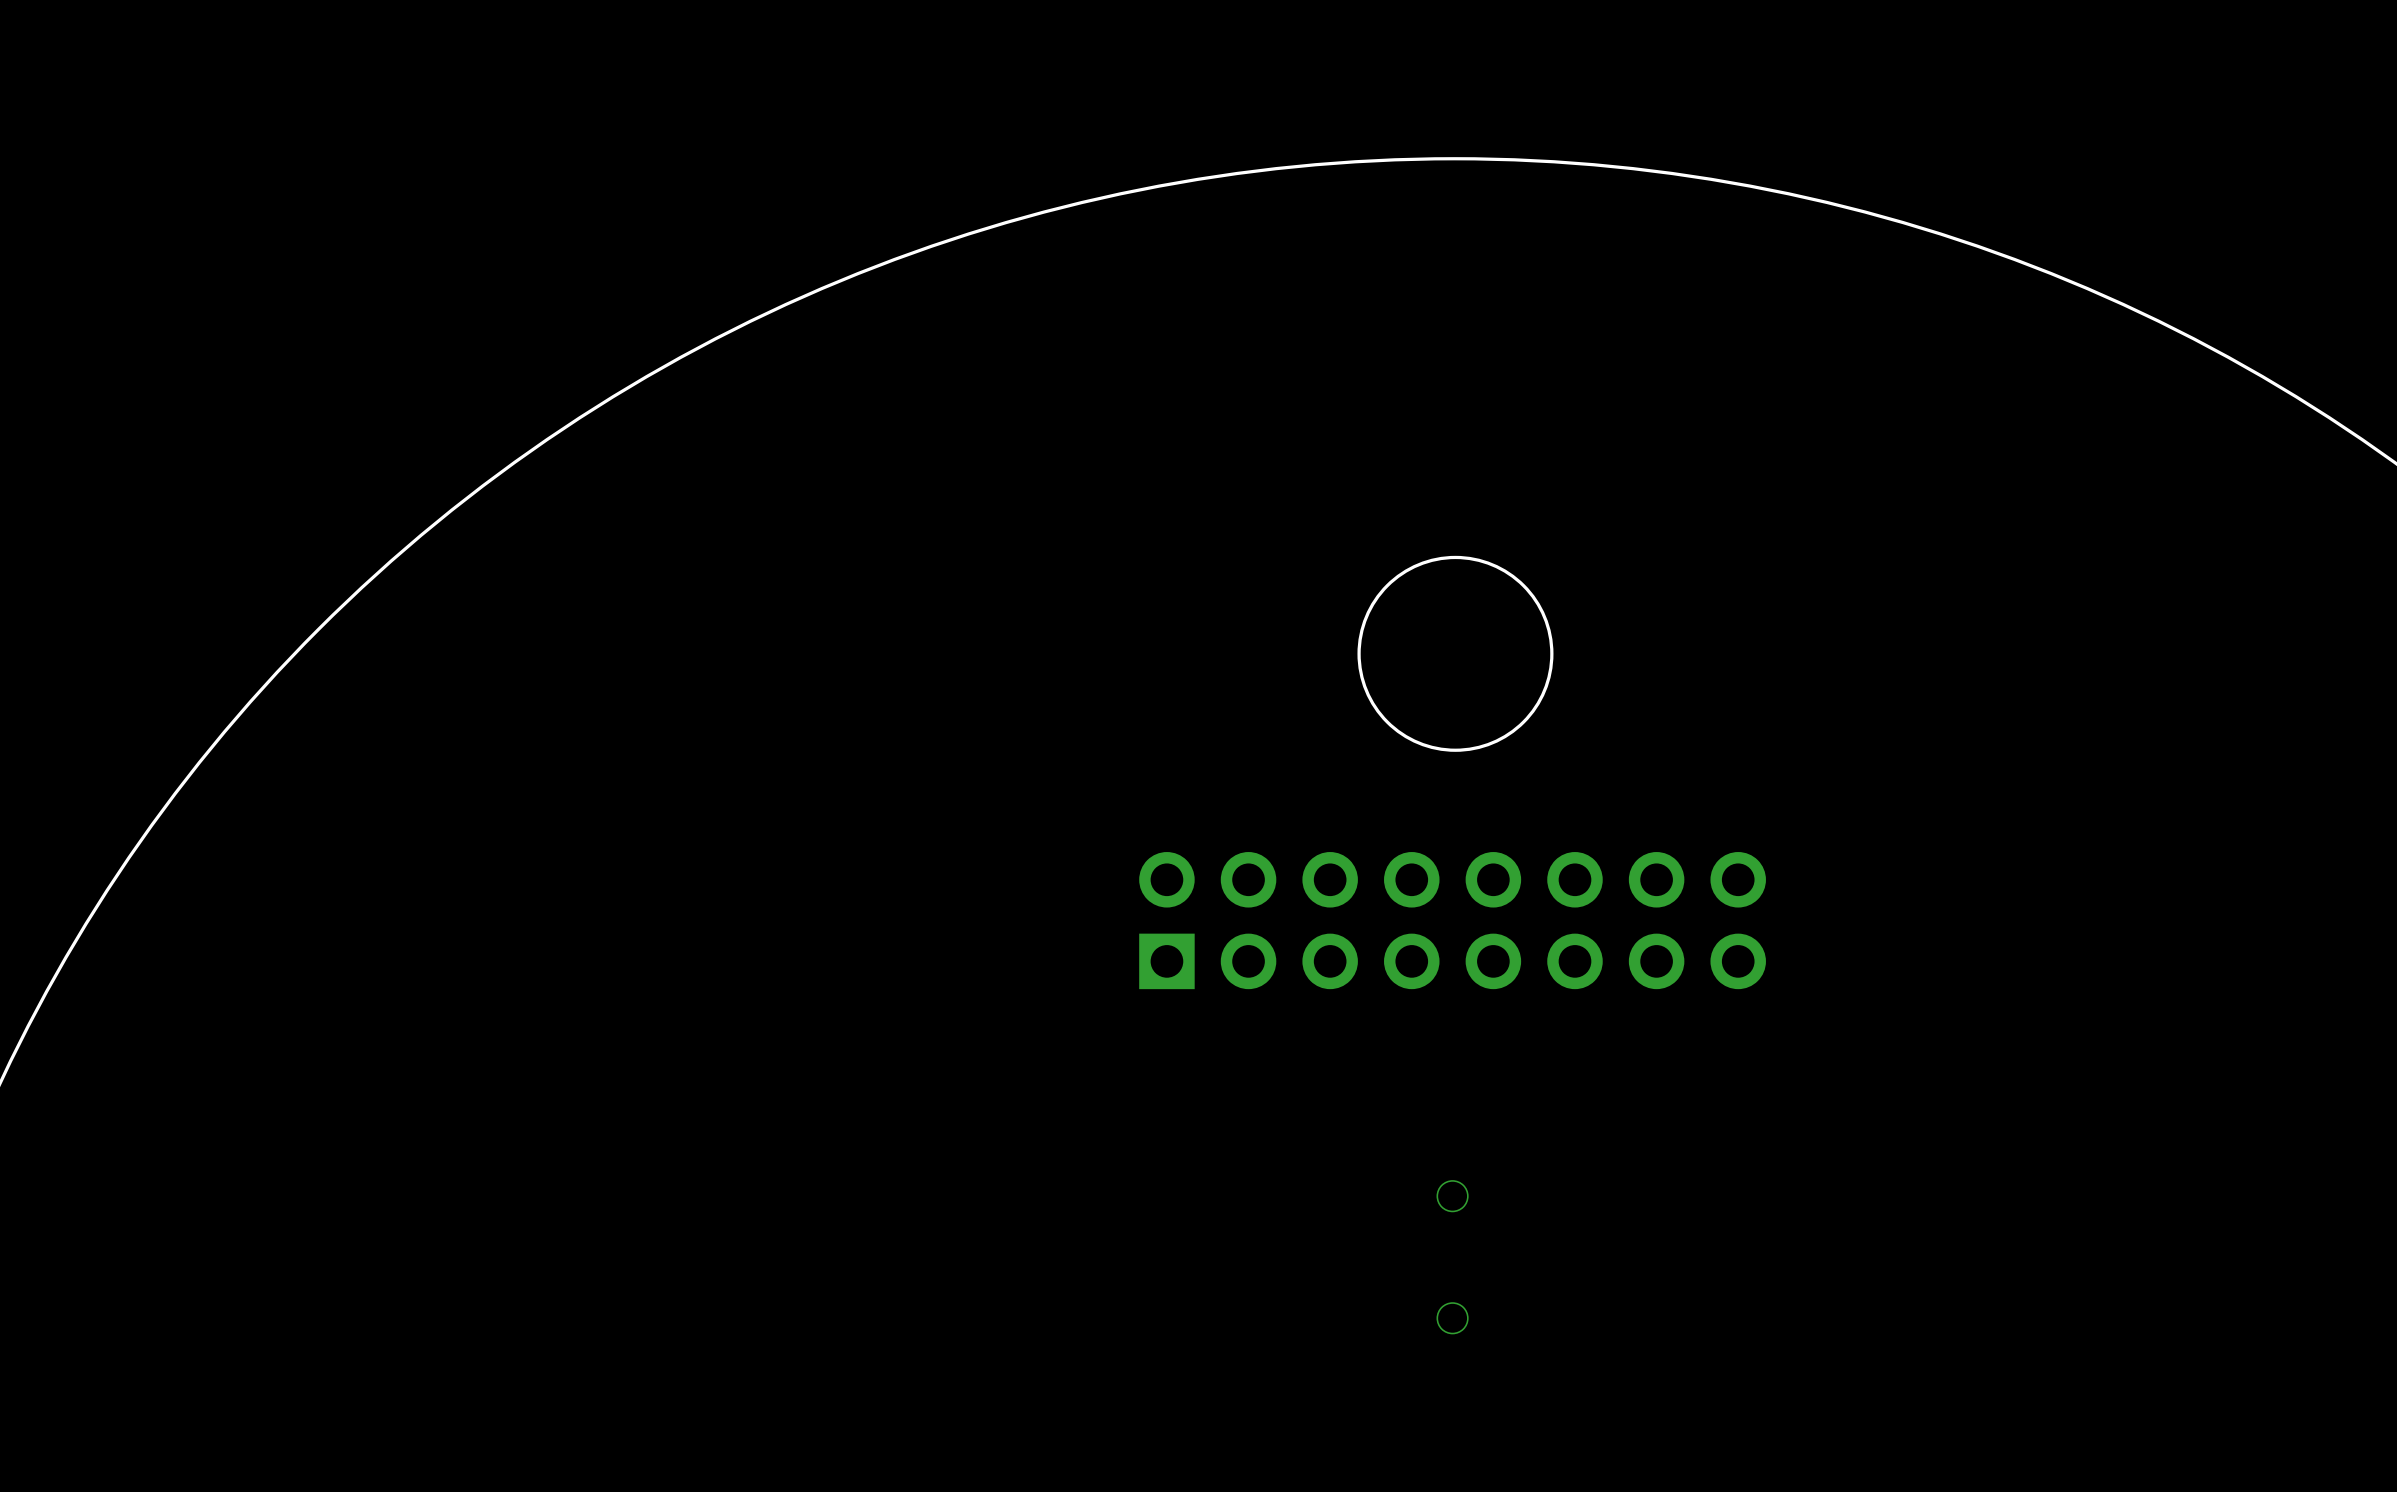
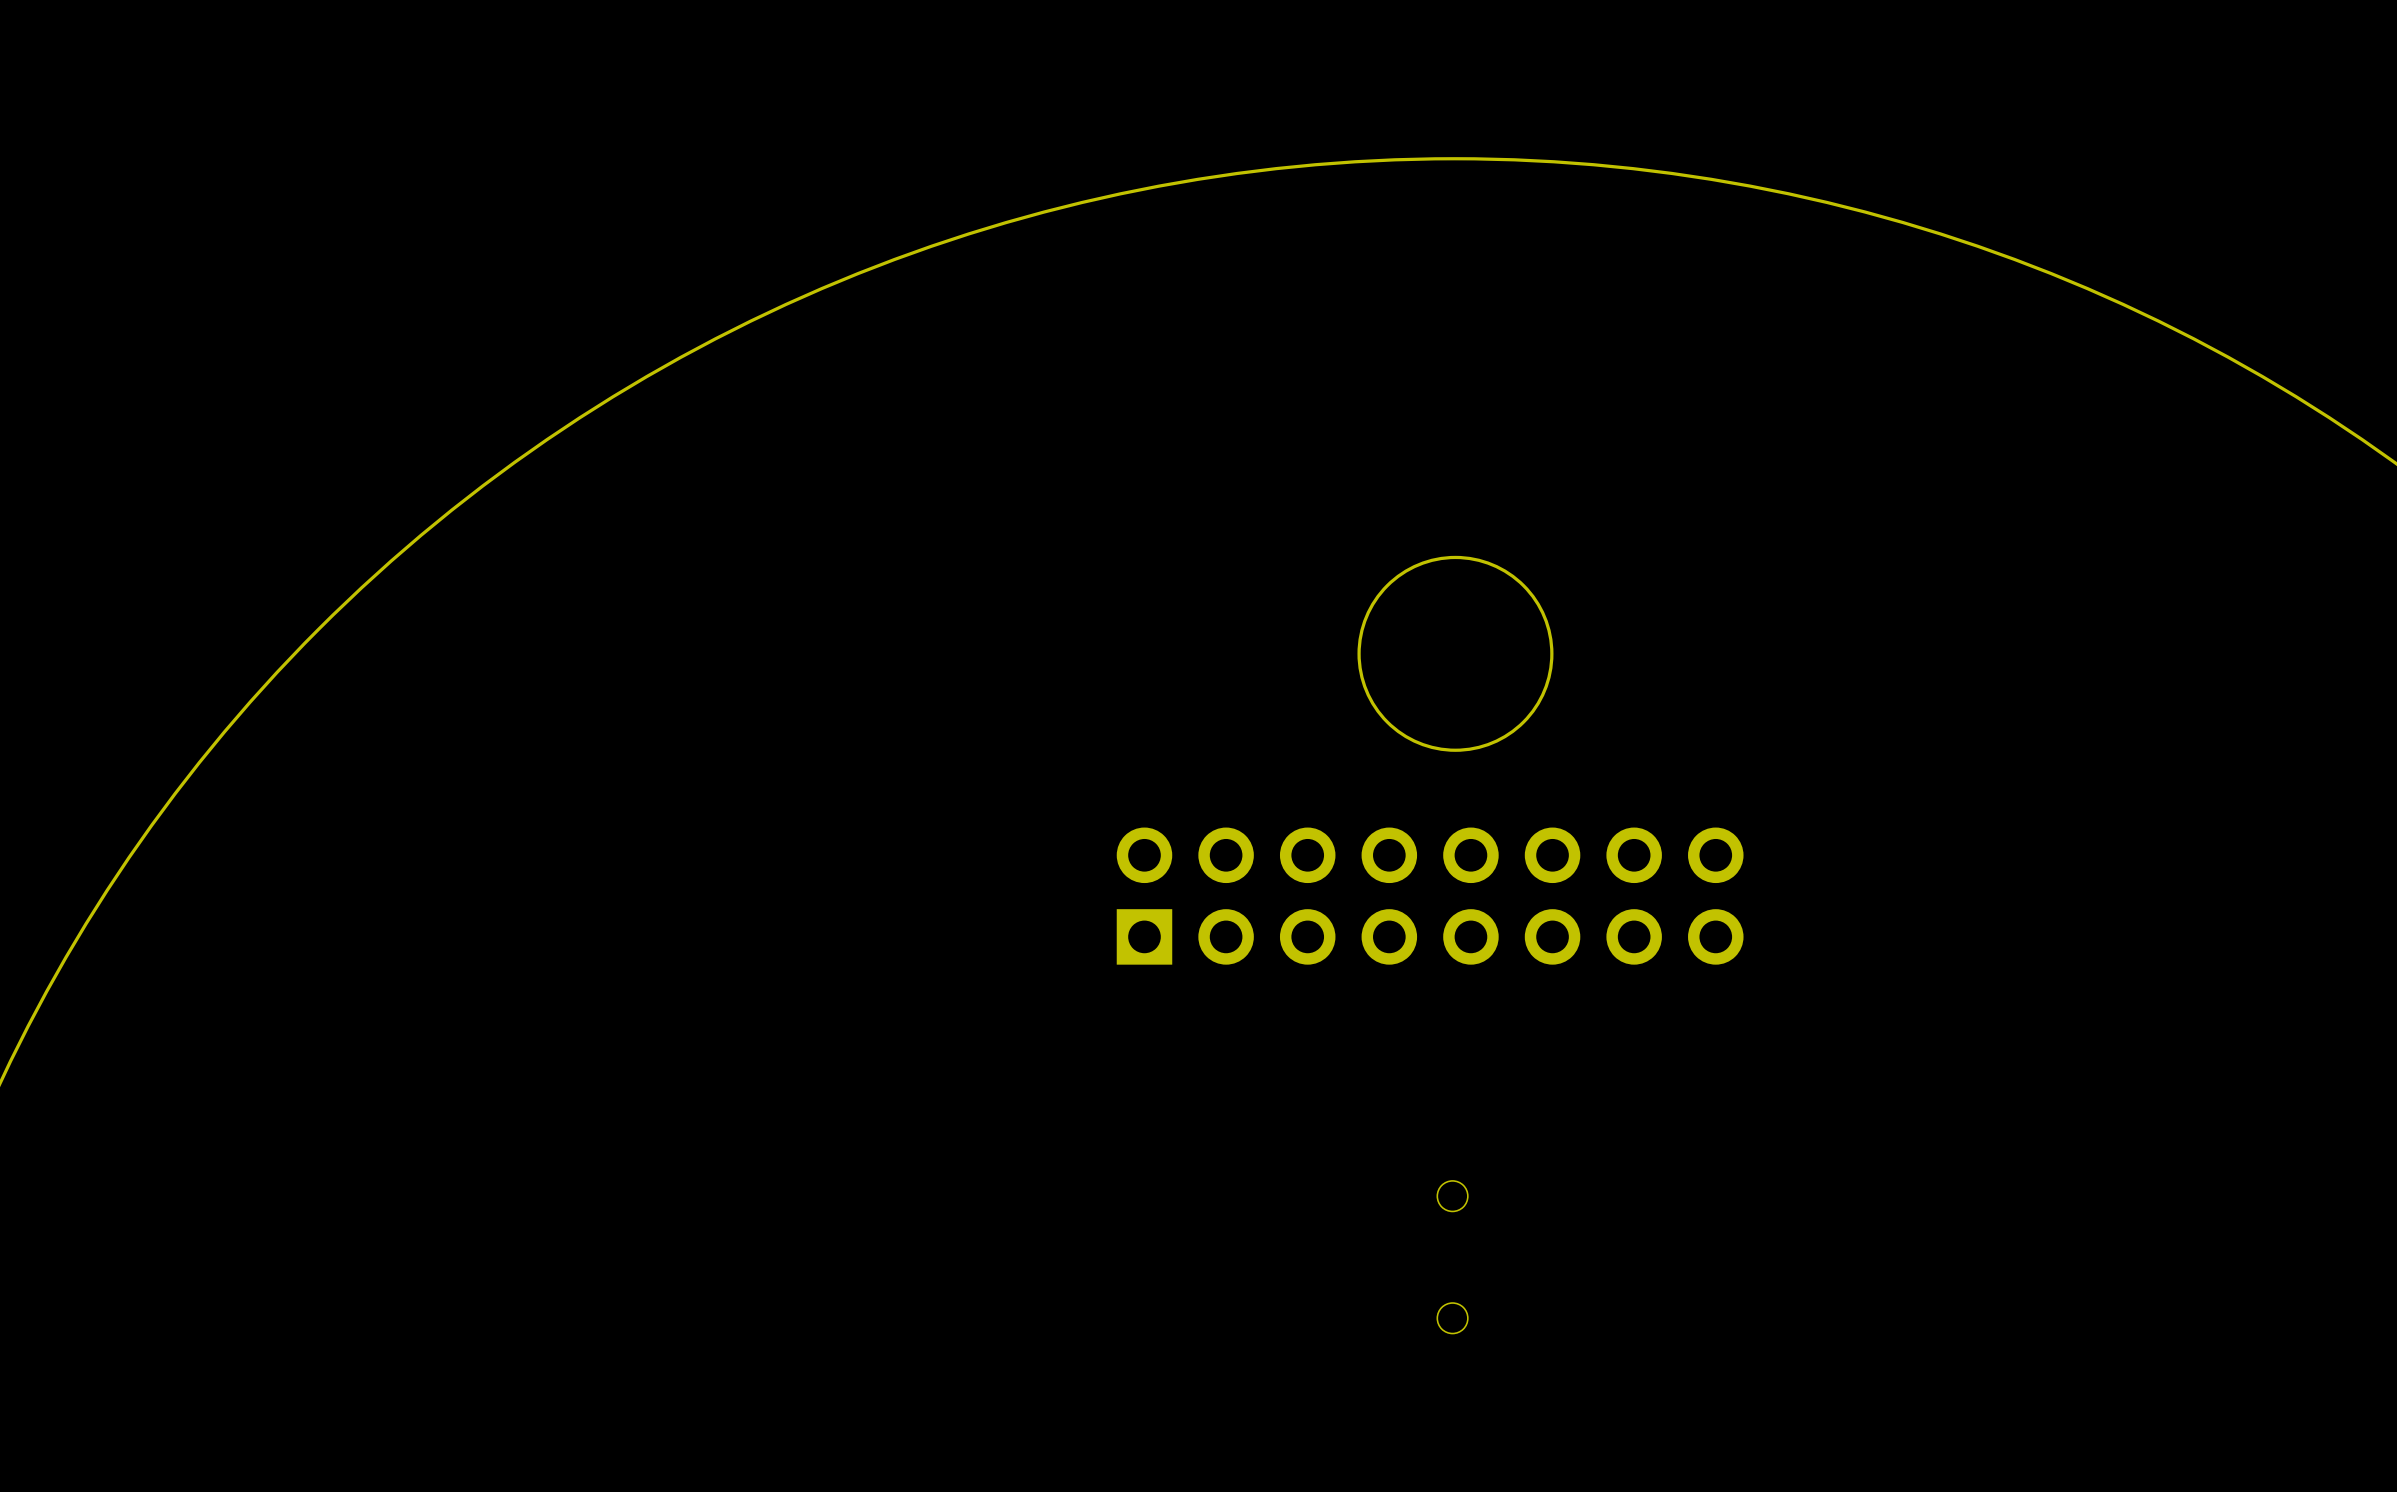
part position: (1452, 920) -> (1430, 896)

